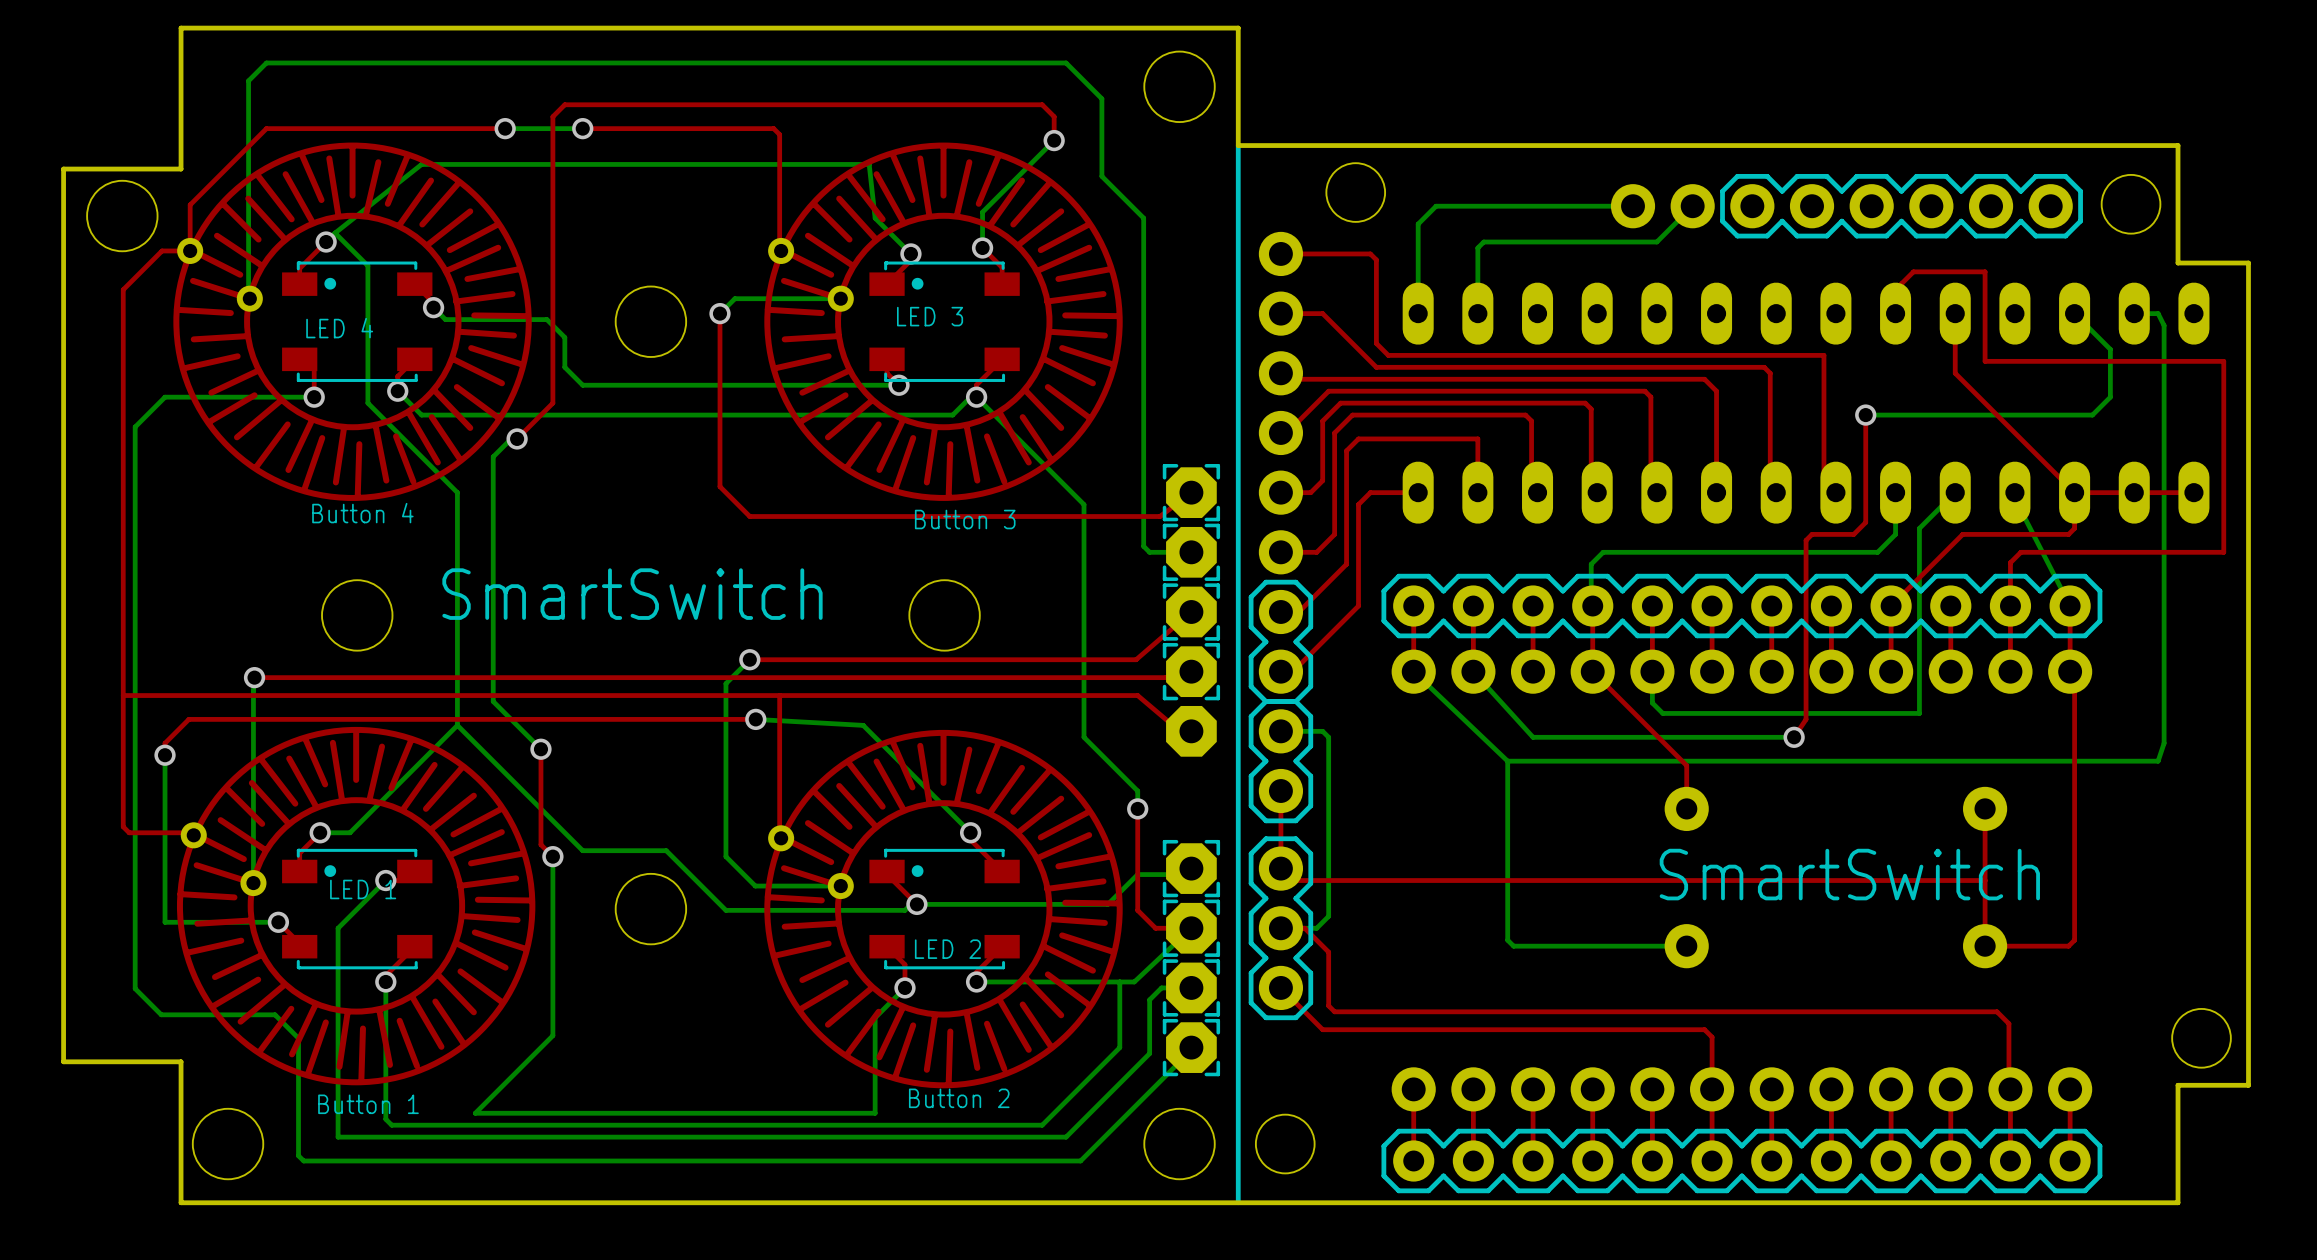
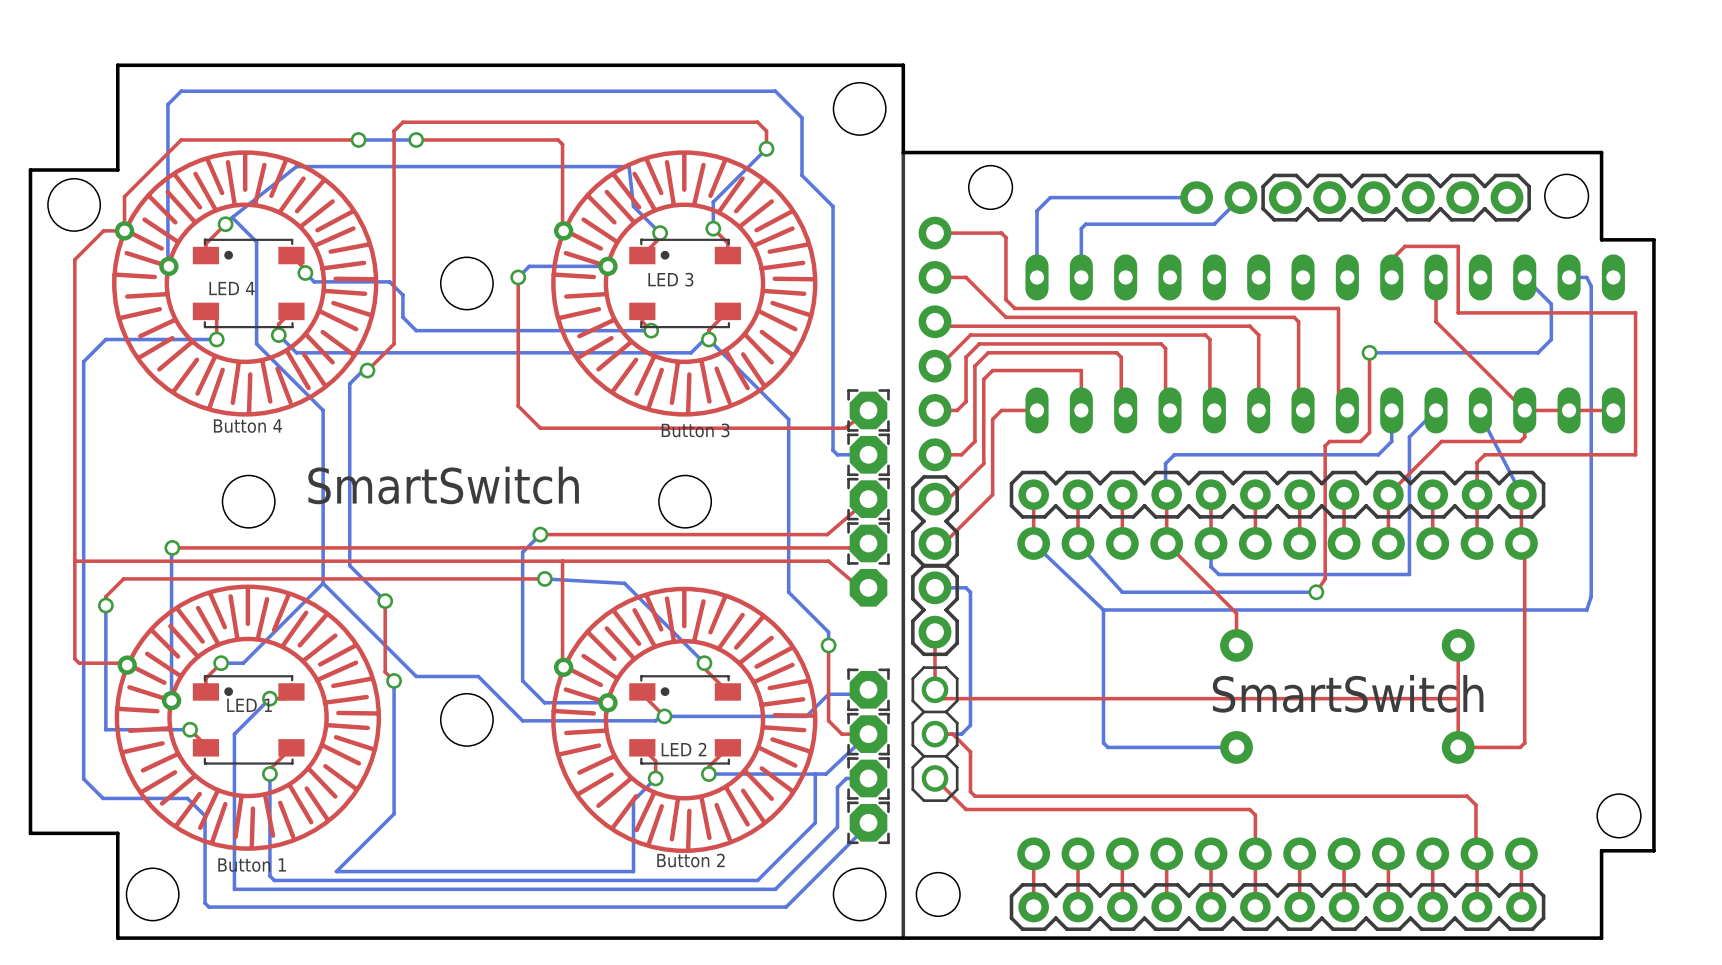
part footprint: [1248, 836, 1314, 1021] -> [911, 666, 959, 802]

